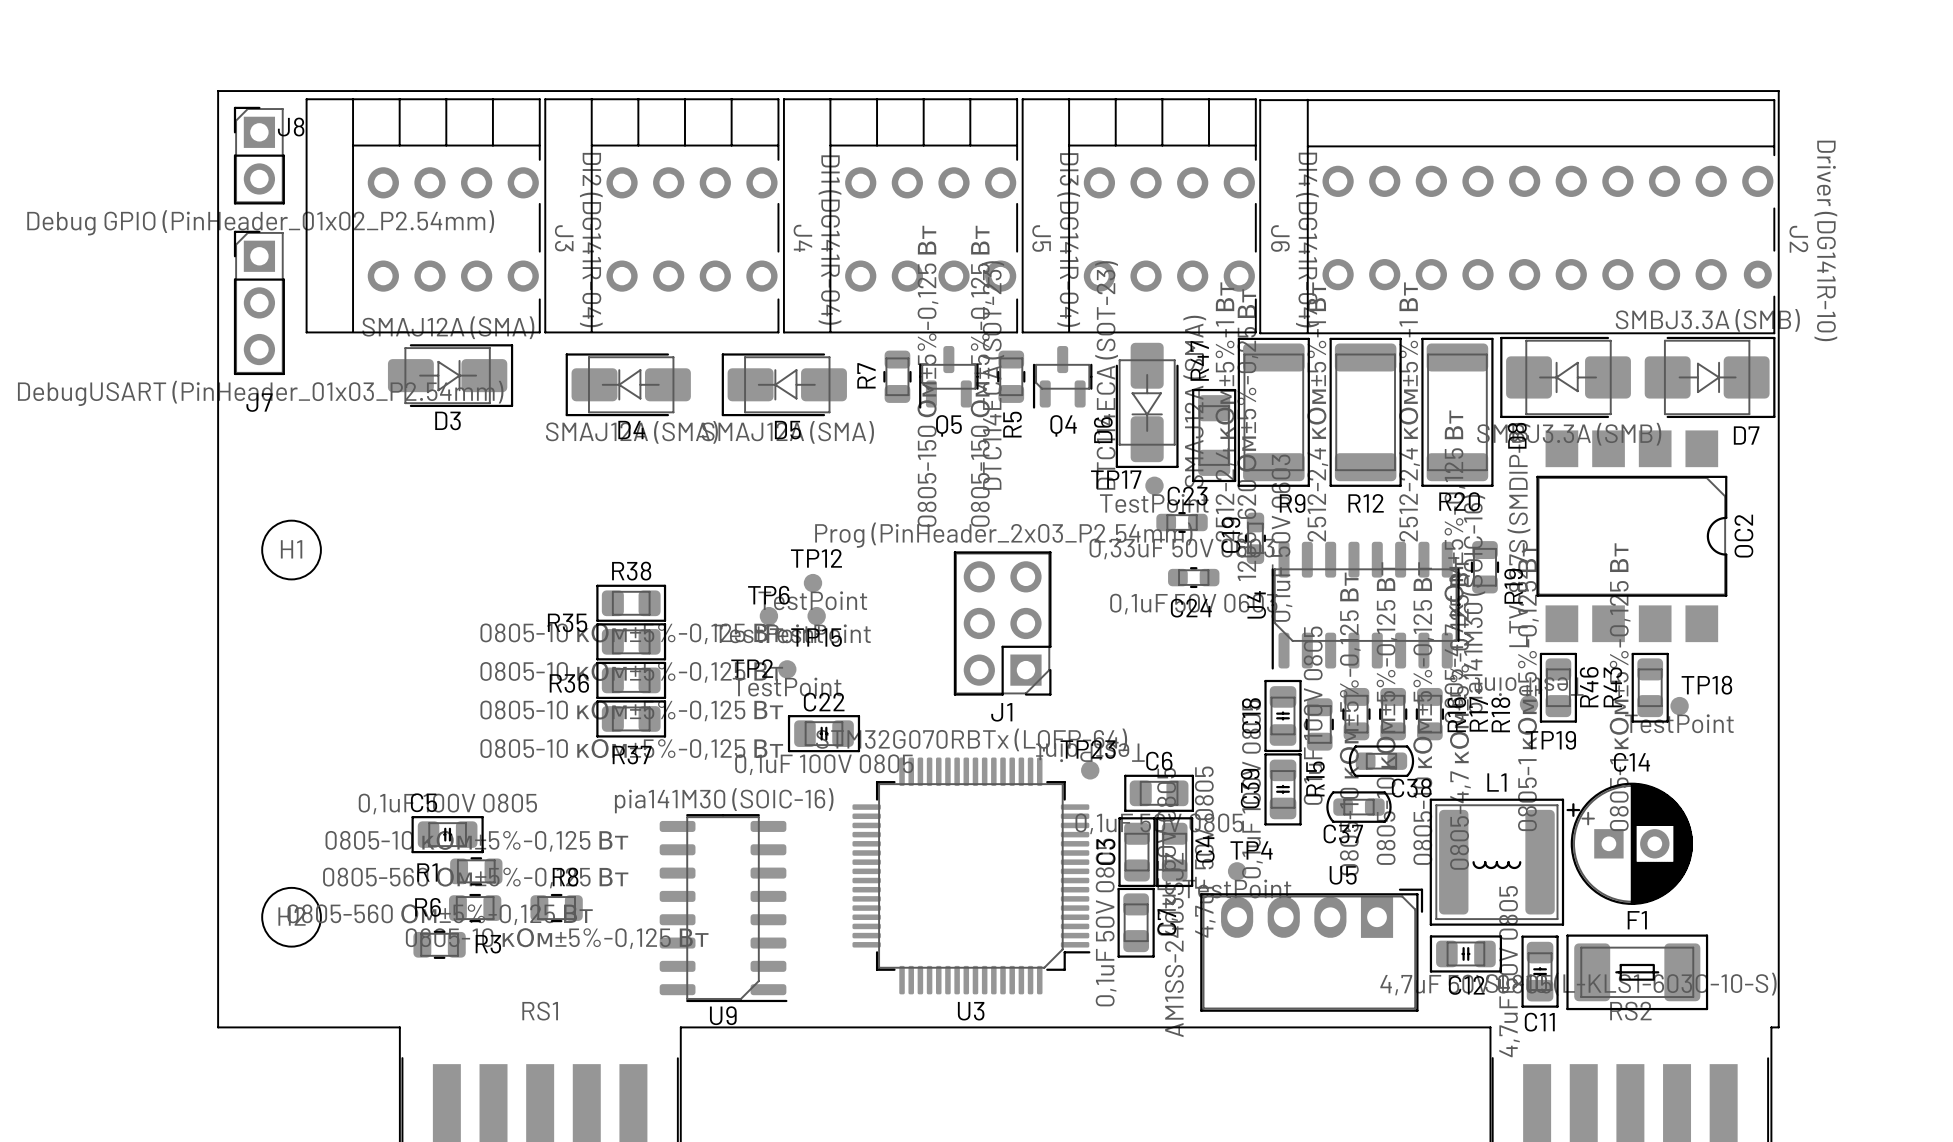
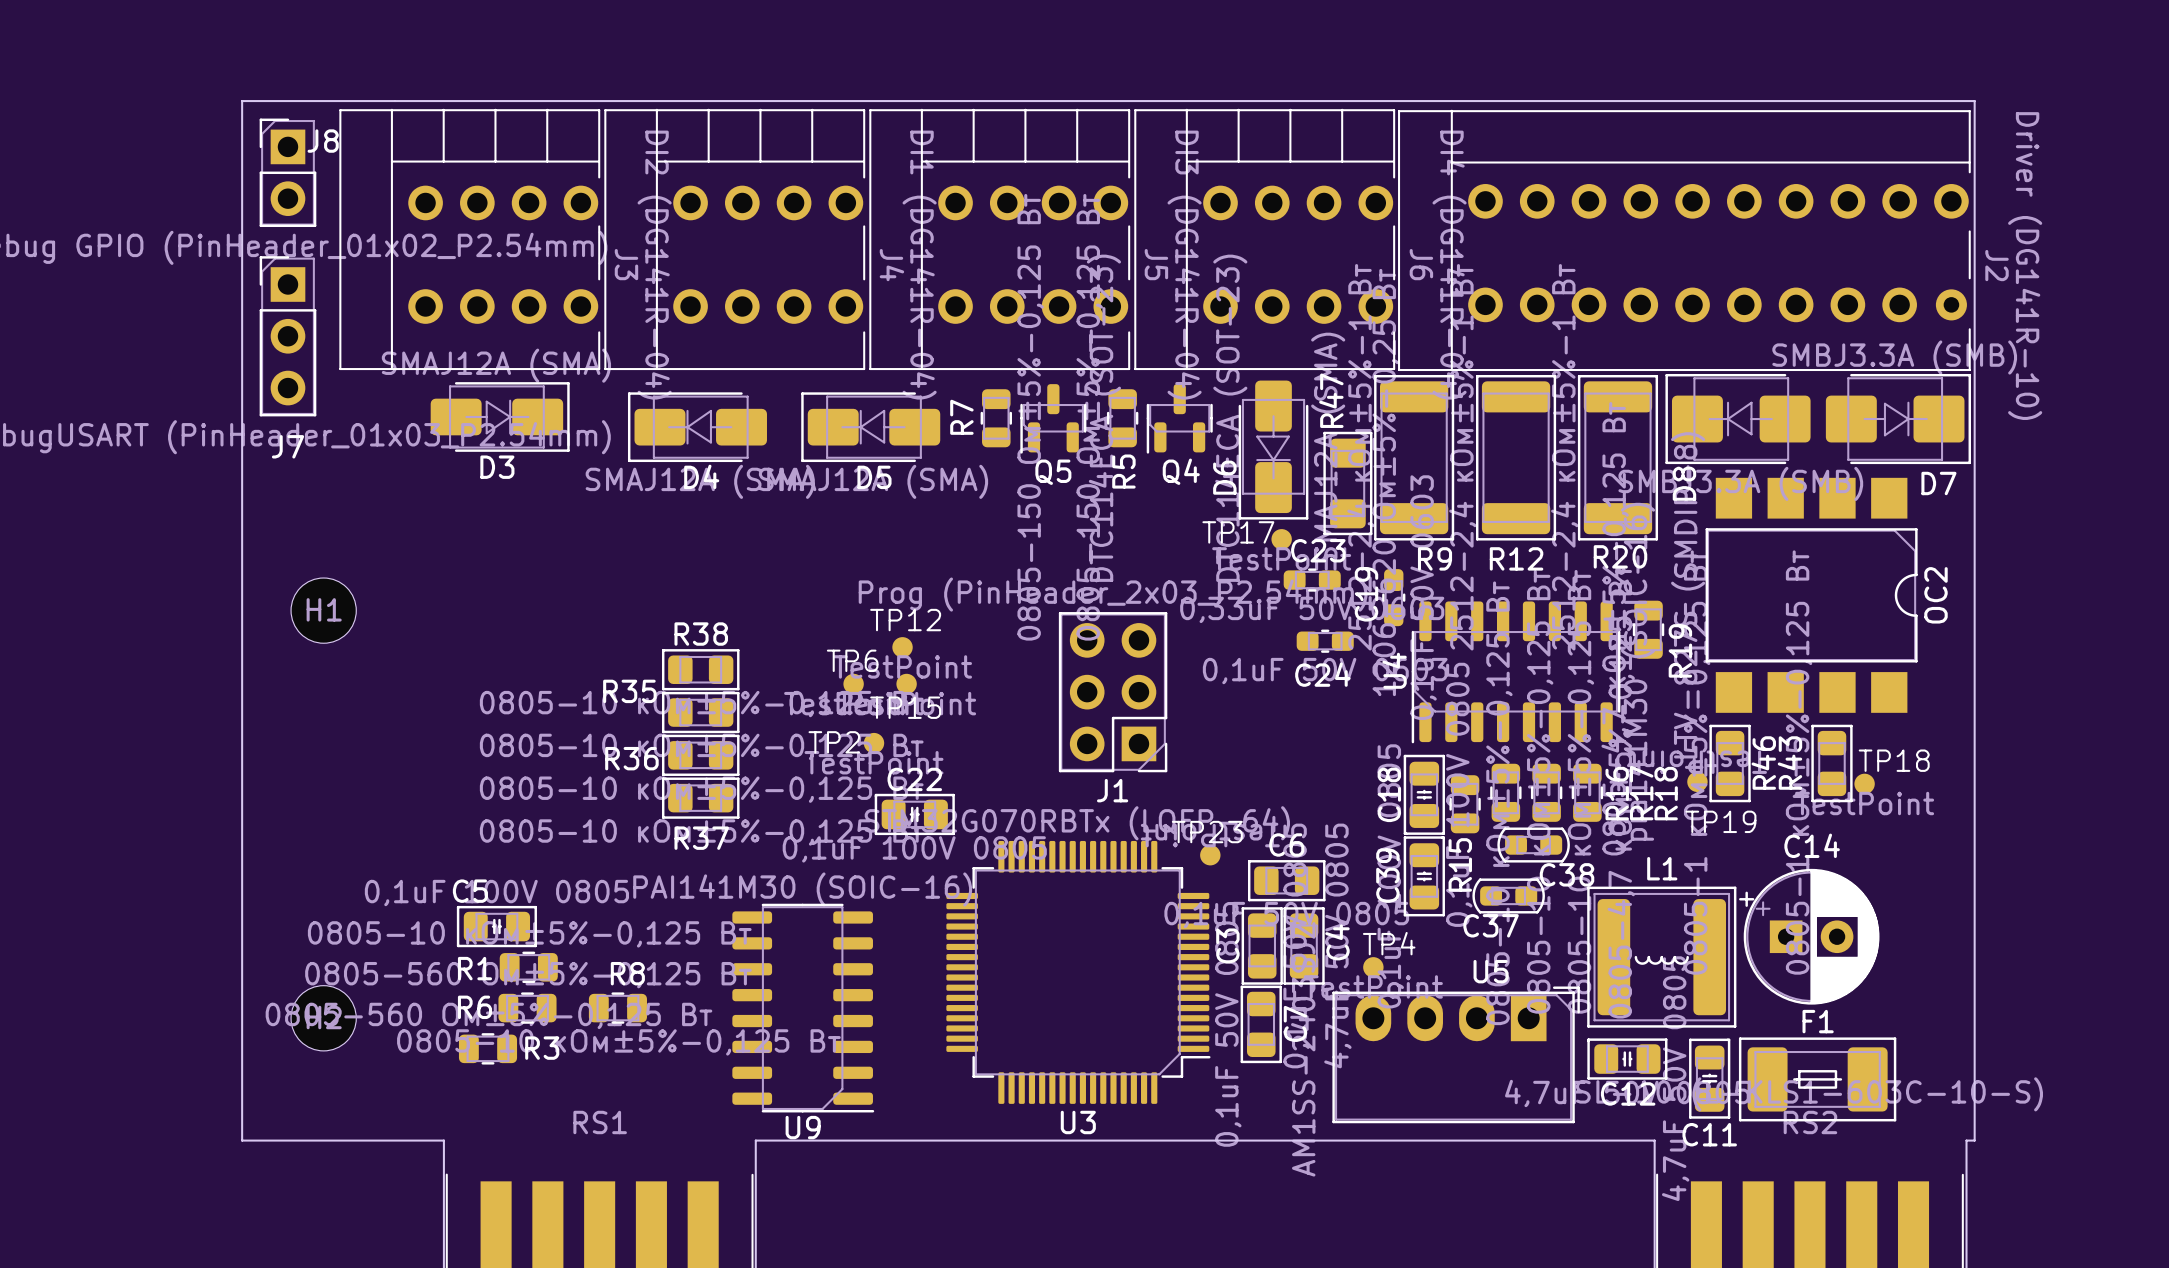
U9 value: pia141M30 (SOIC-16) (724, 800) -> PAI141M30 (SOIC-16) (802, 889)

